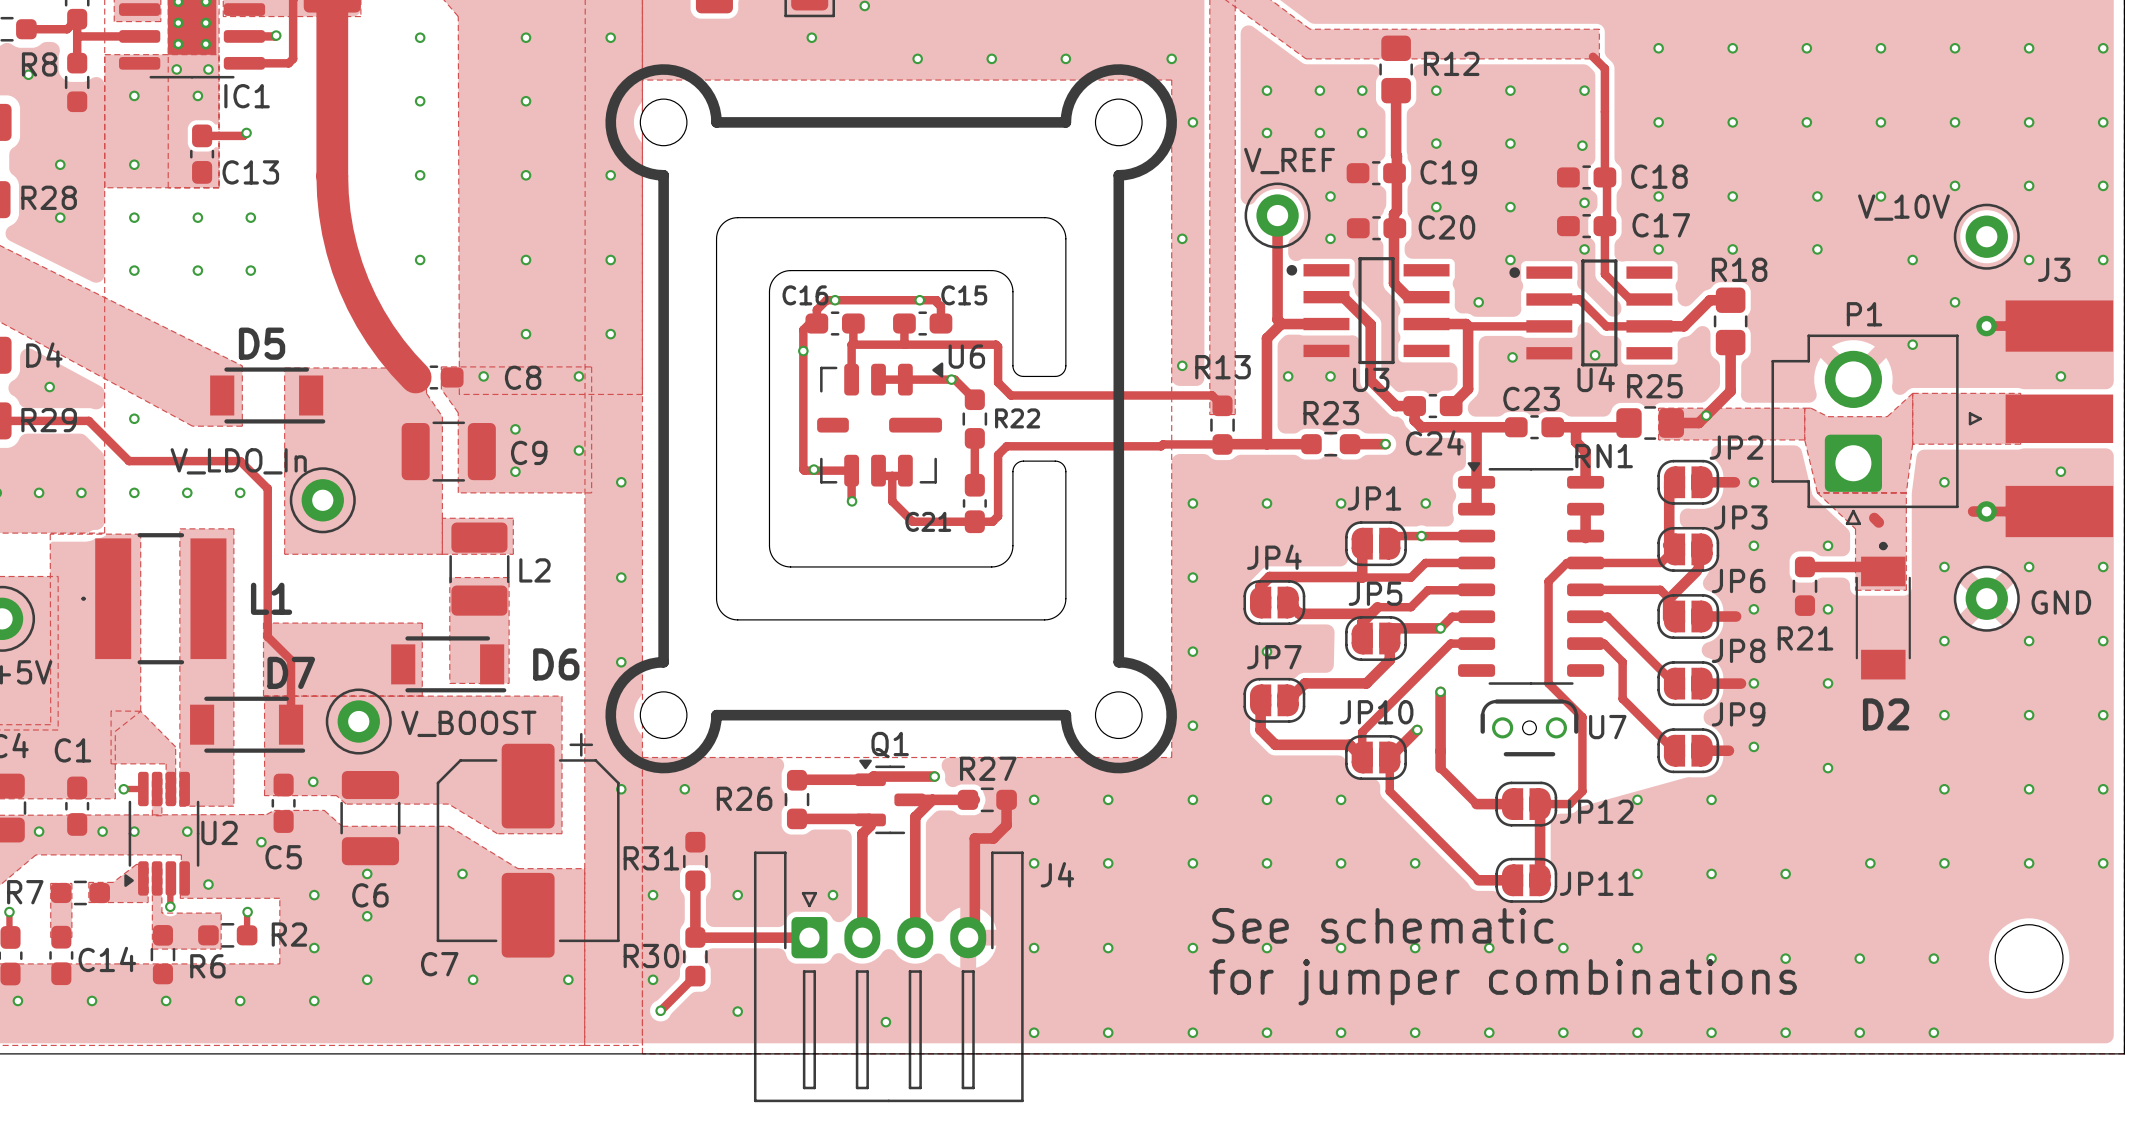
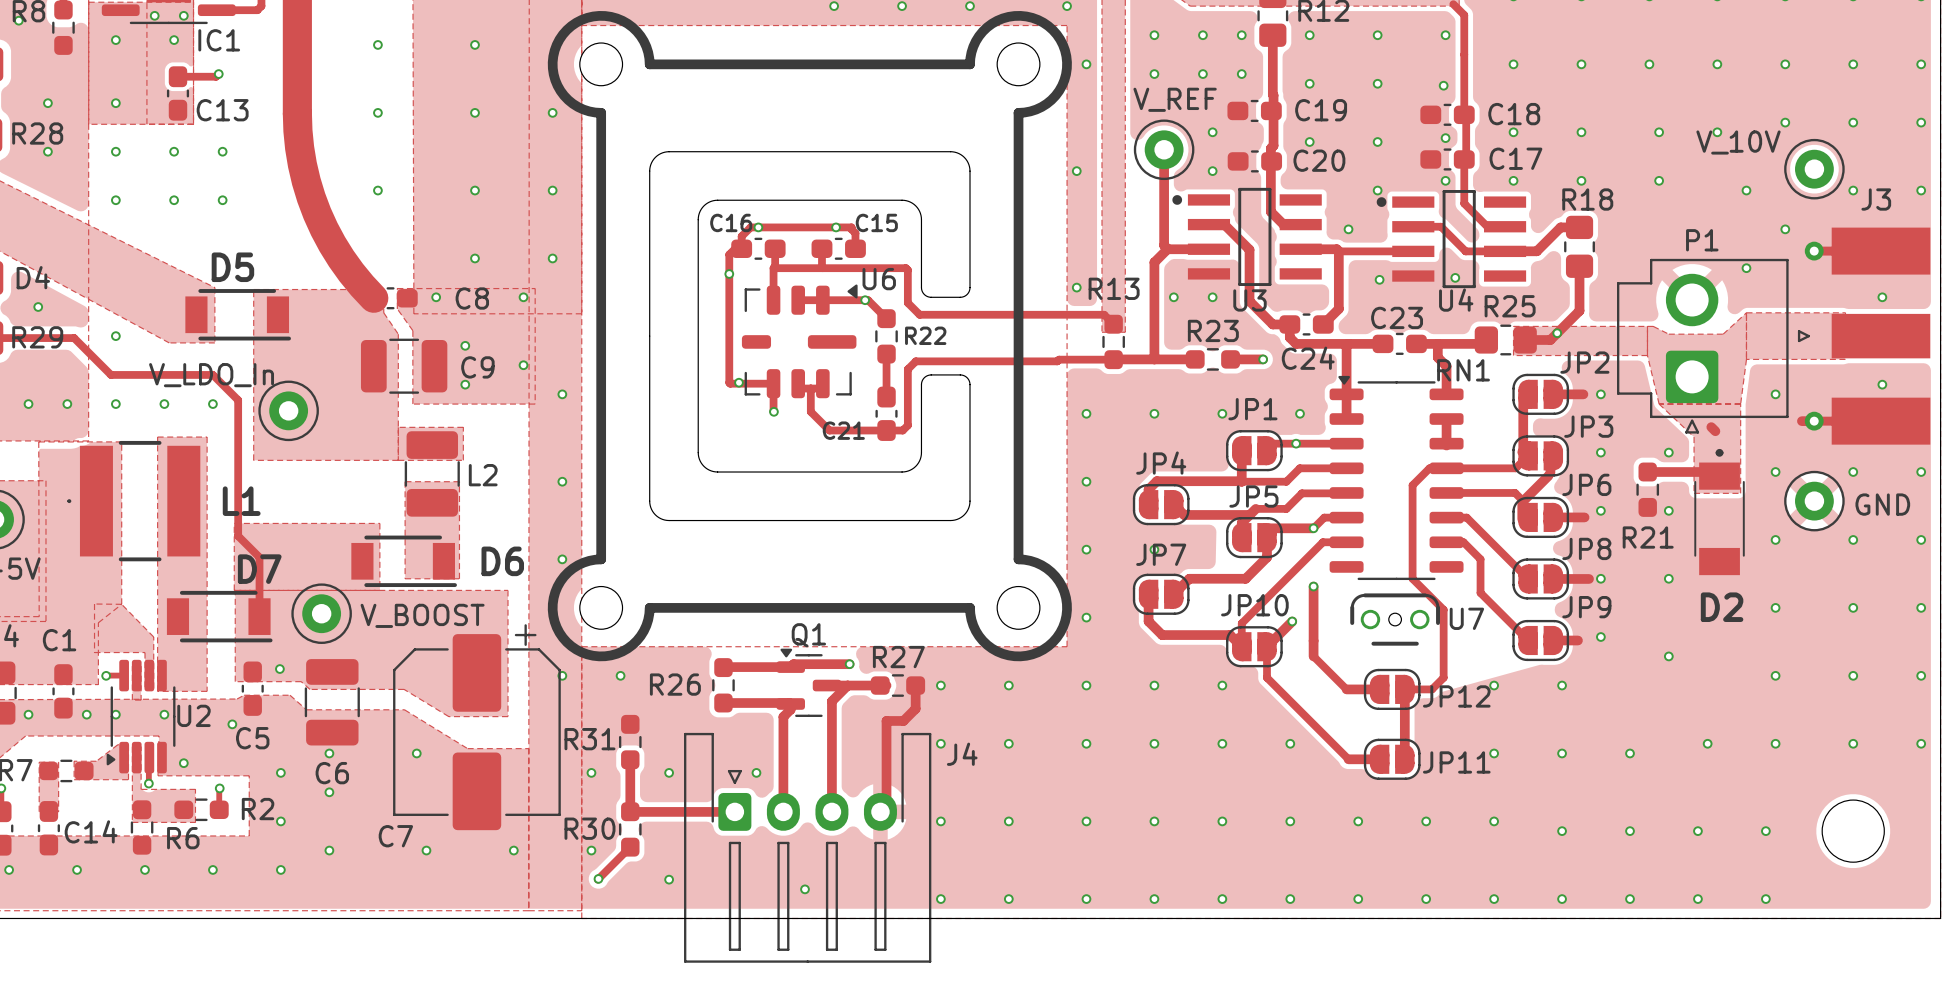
text: See schematic (1382, 925) -> none
text: for jumper combinations (1503, 982) -> none

